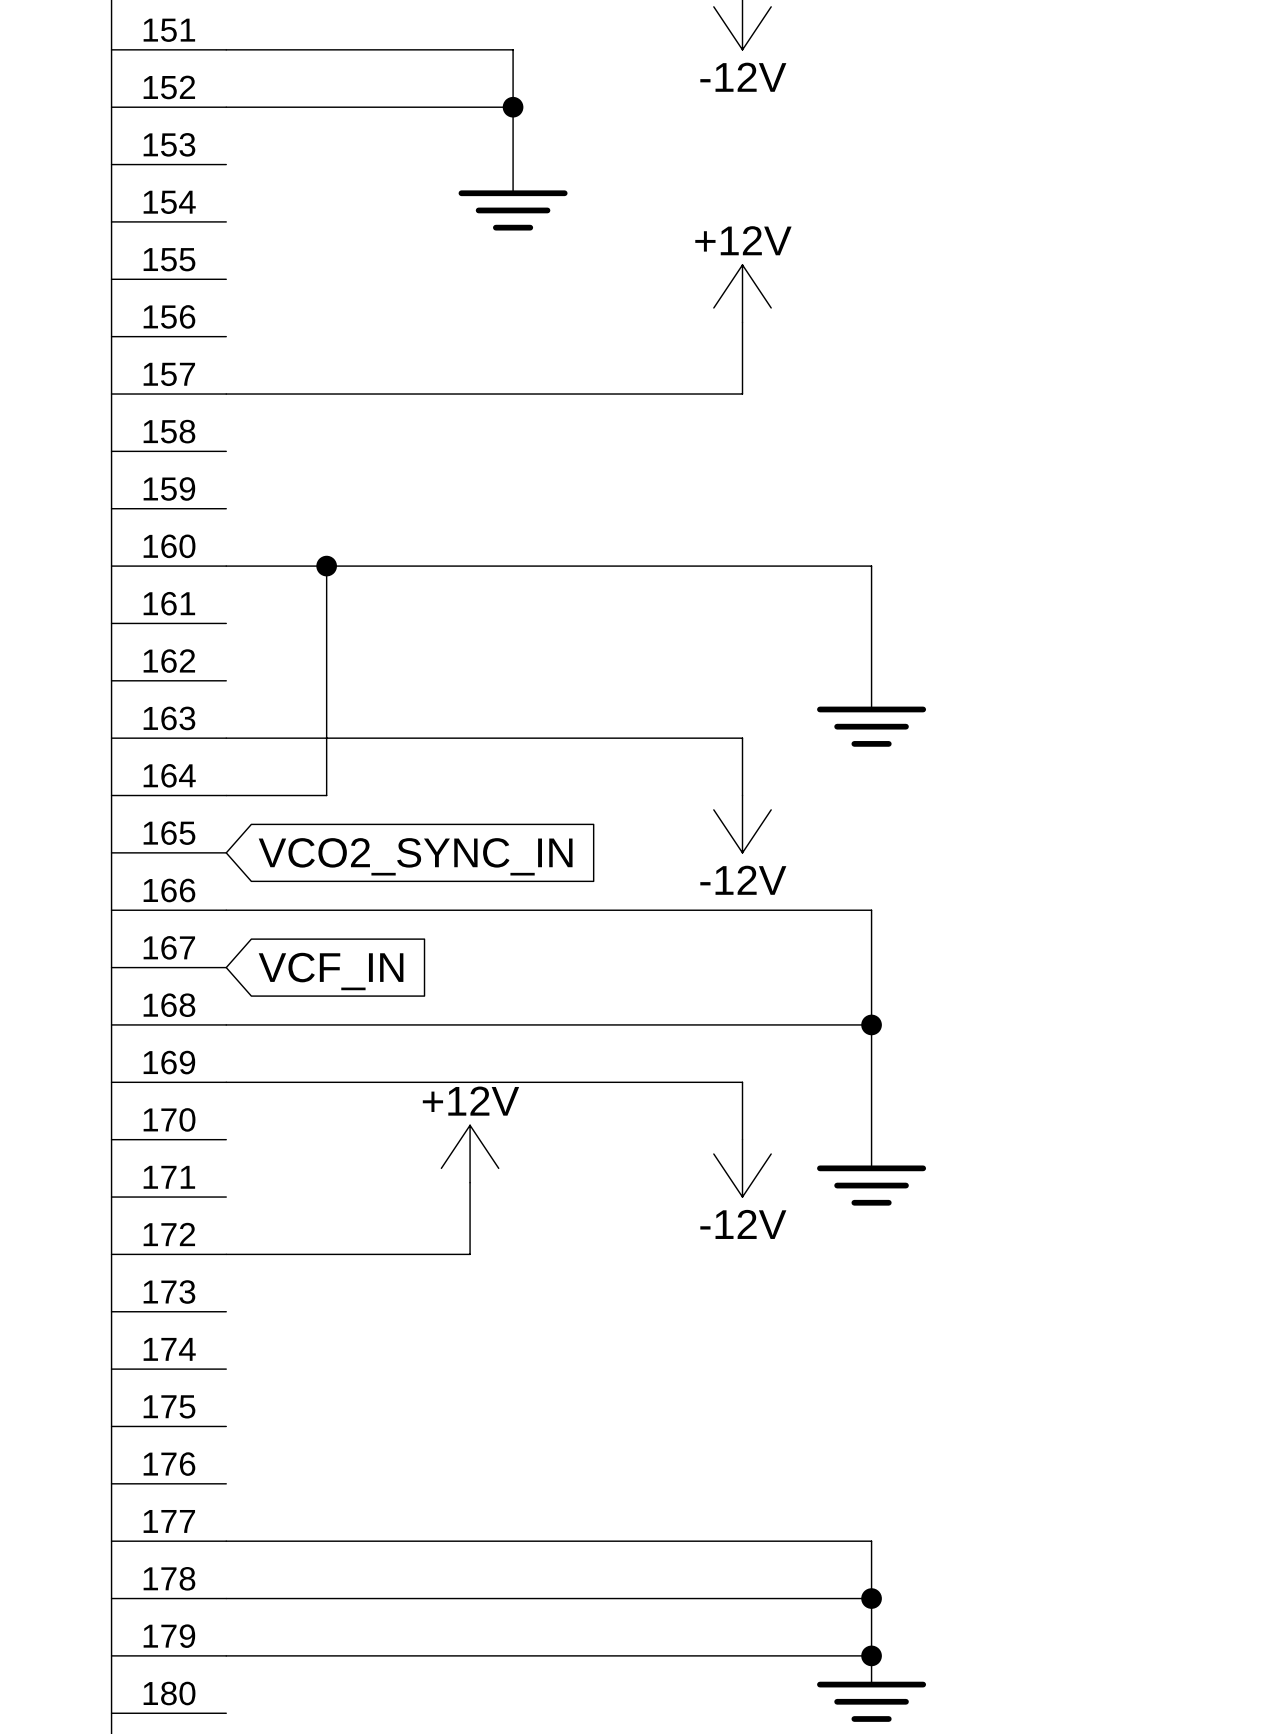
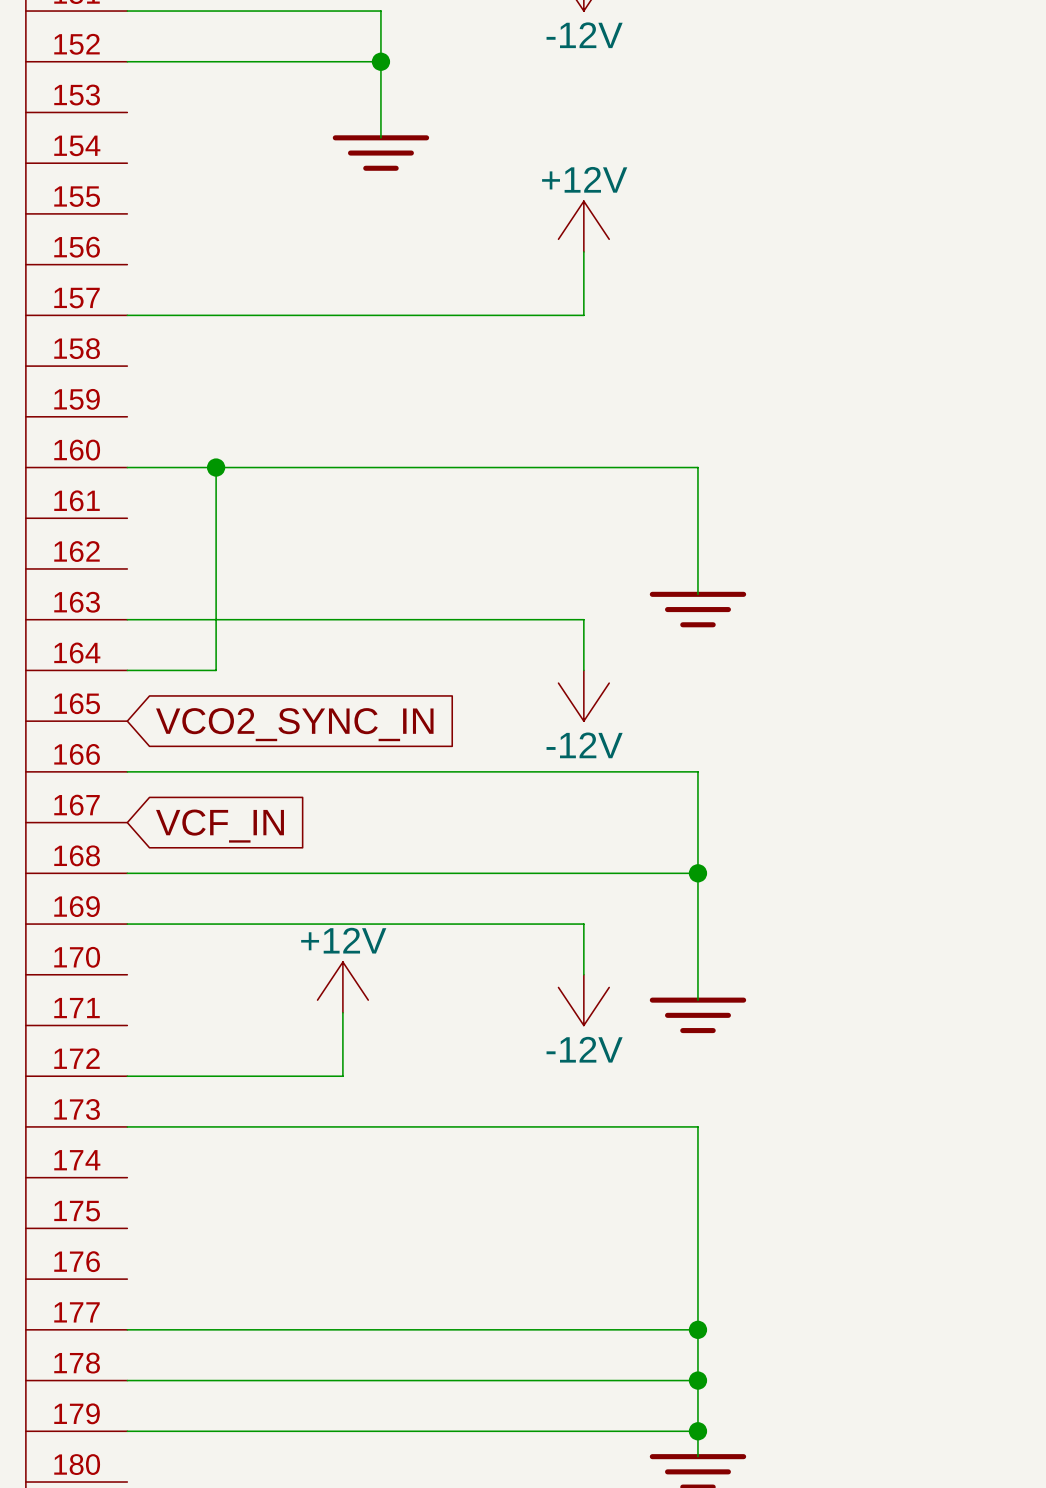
wire: none -> (127, 1126) (697, 1126) (697, 1329)
junction: none -> (697, 1329)

